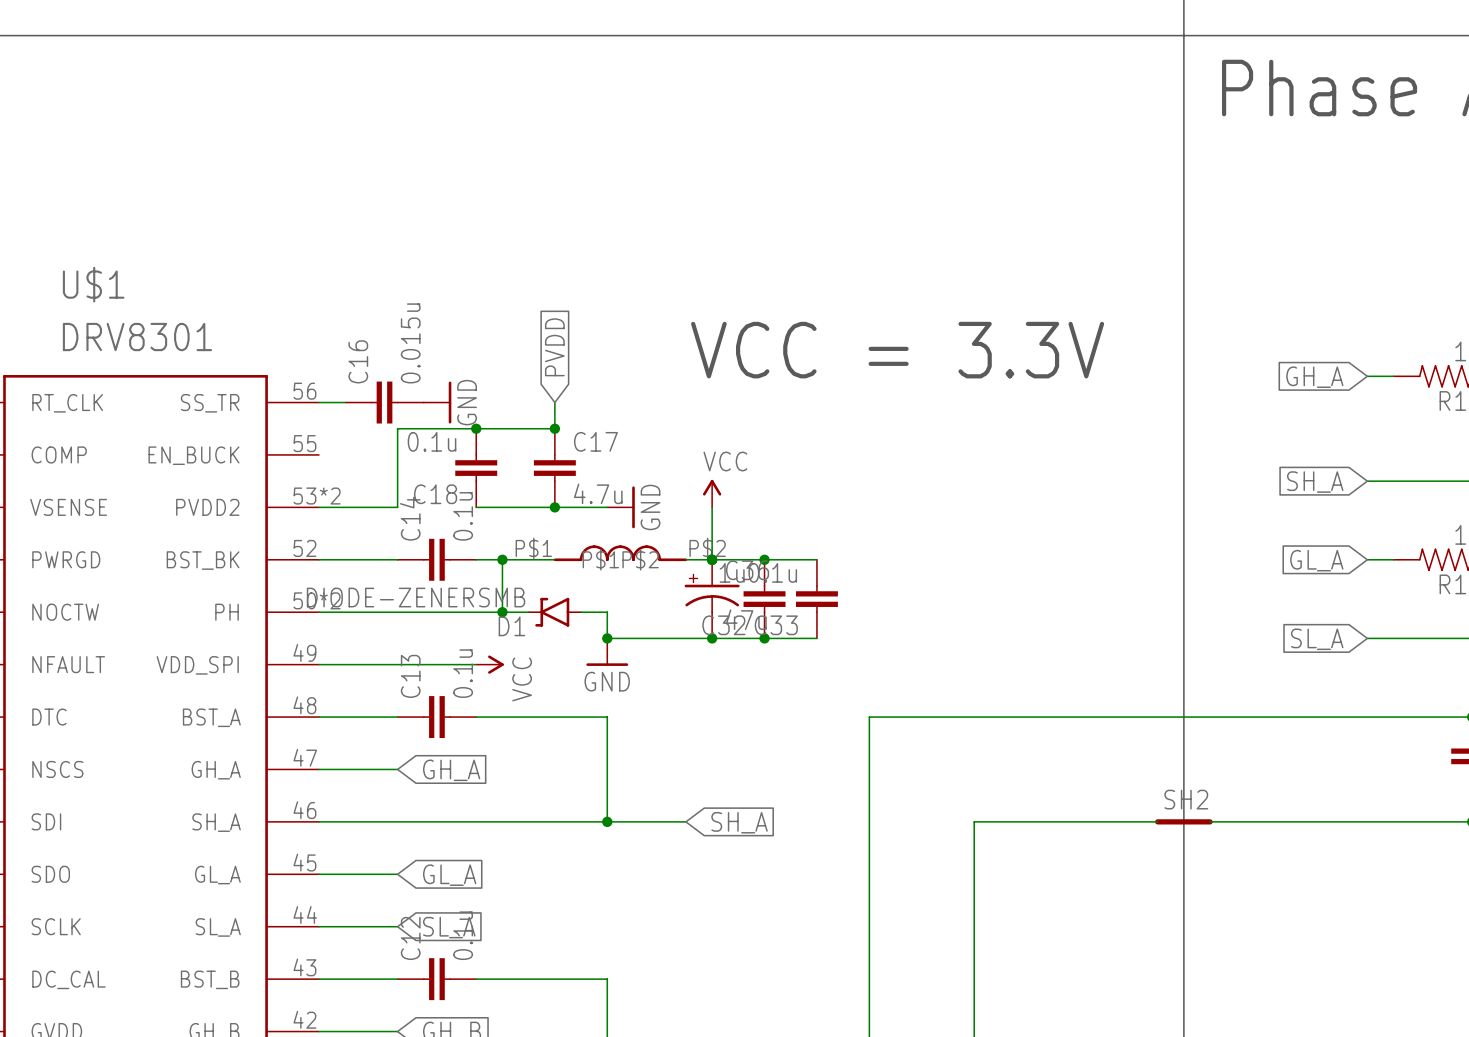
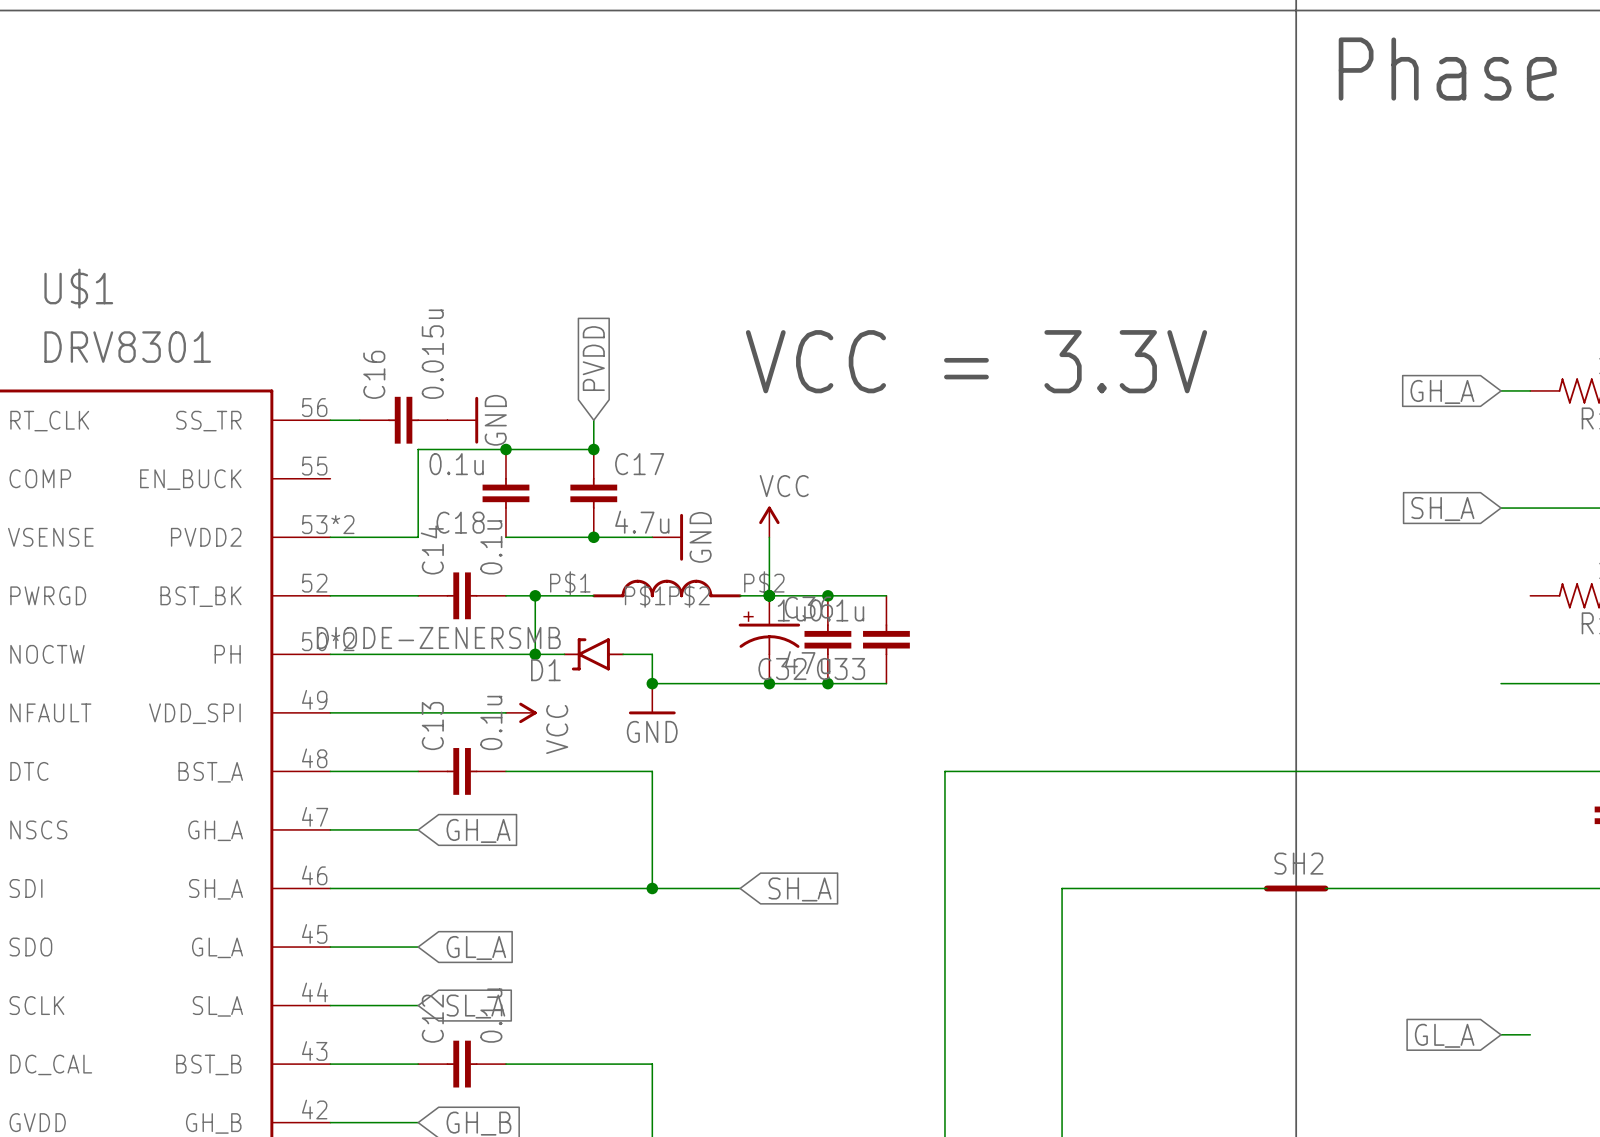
wire: (1367, 559) (1393, 559) -> none
global label: GL_A (1316, 560) -> none
global label: SL_A (1317, 639) -> none
wire: none -> (1501, 1034) (1530, 1034)
global label: none -> GL_A (1444, 1035)

